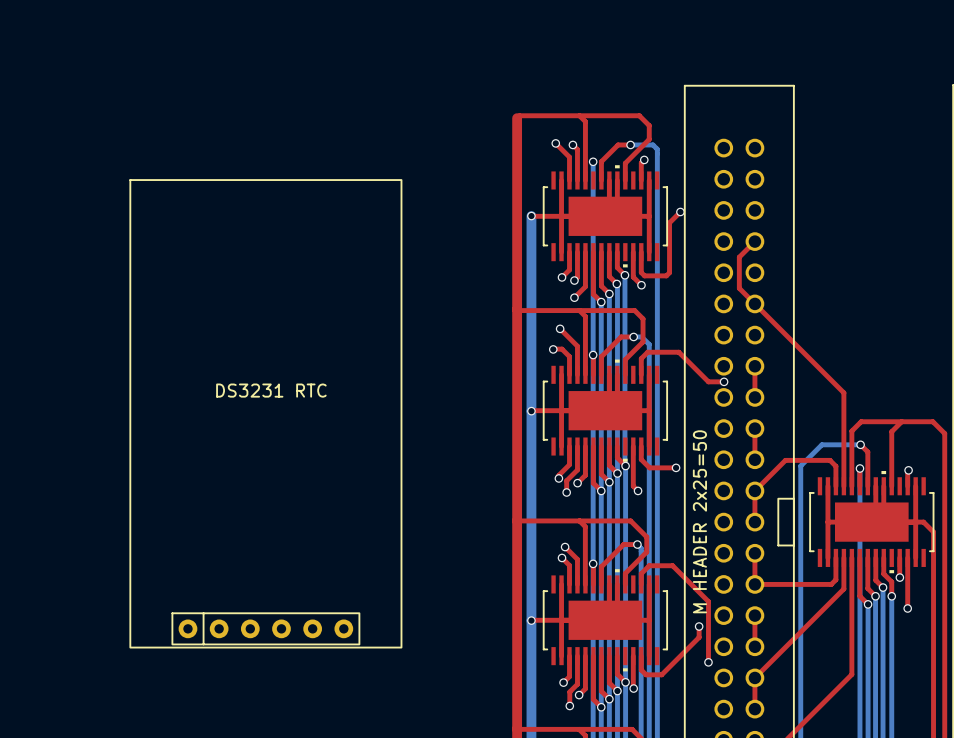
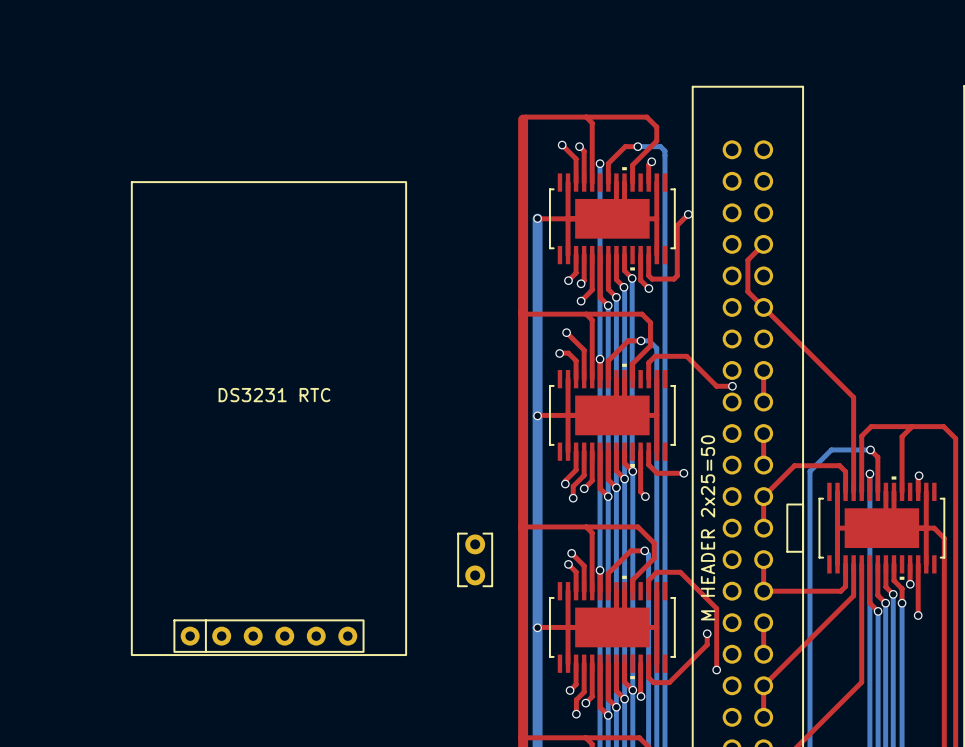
part: none -> (475, 559)

